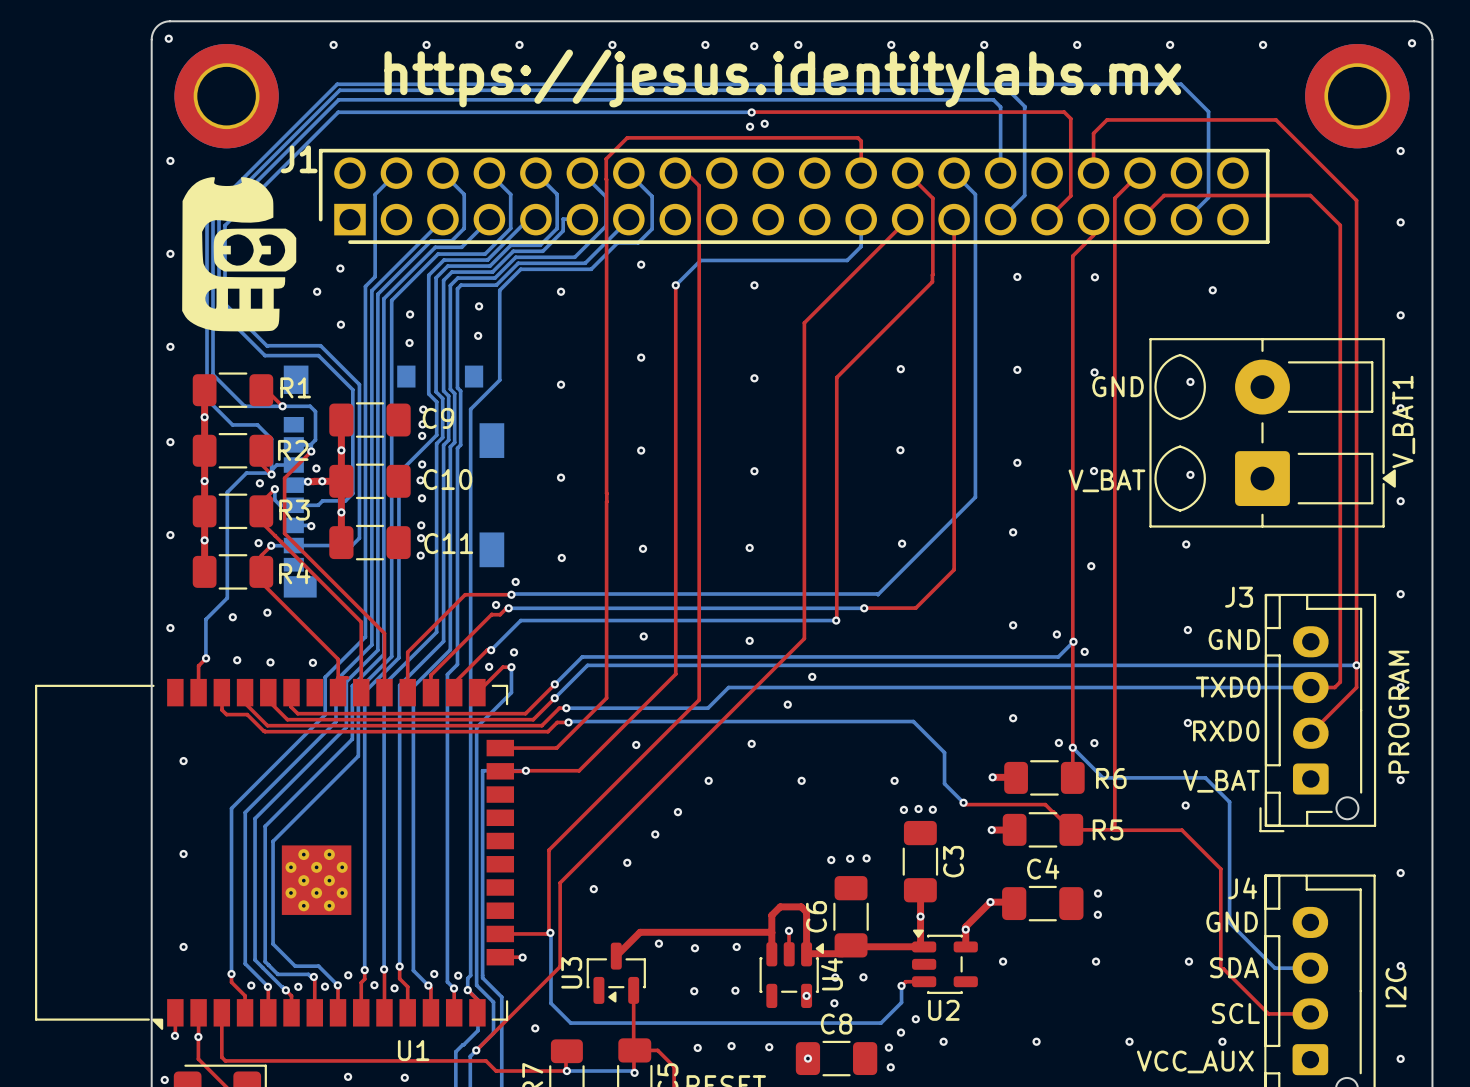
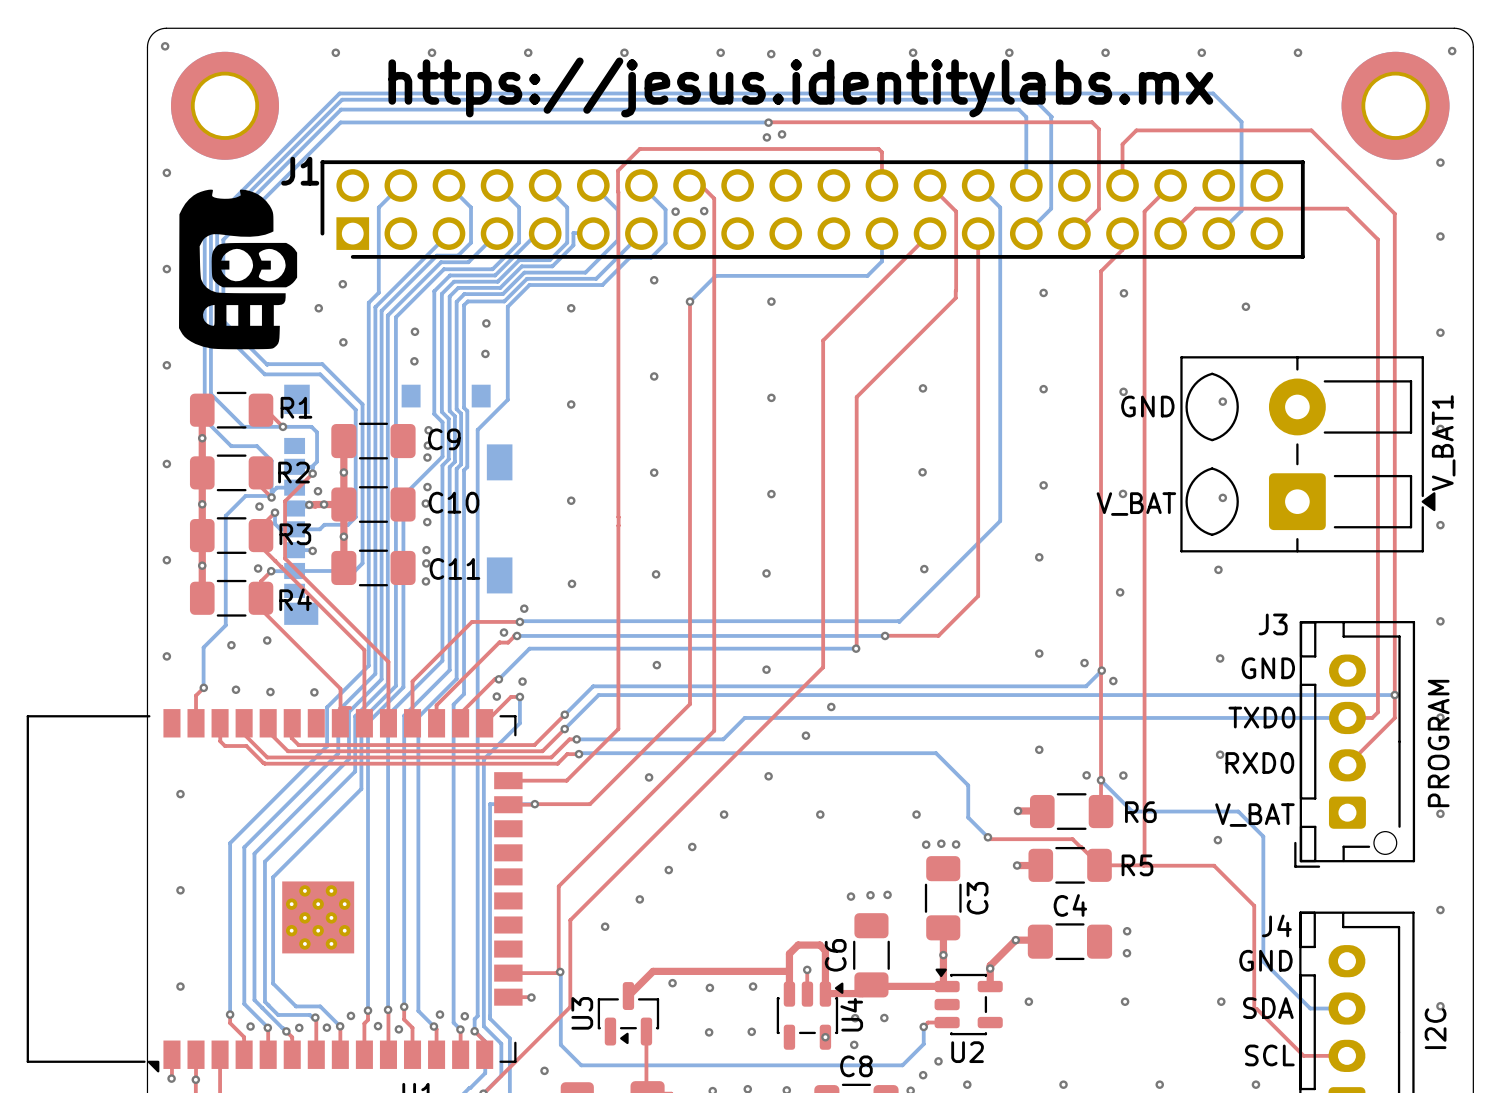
via: none -> (704, 211)
via: none -> (675, 211)

